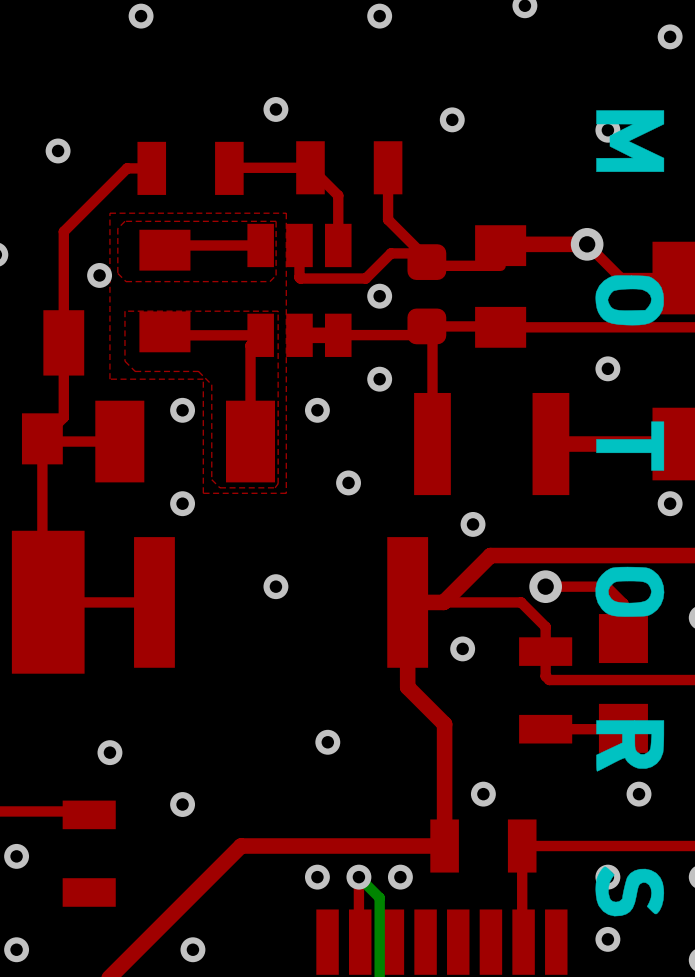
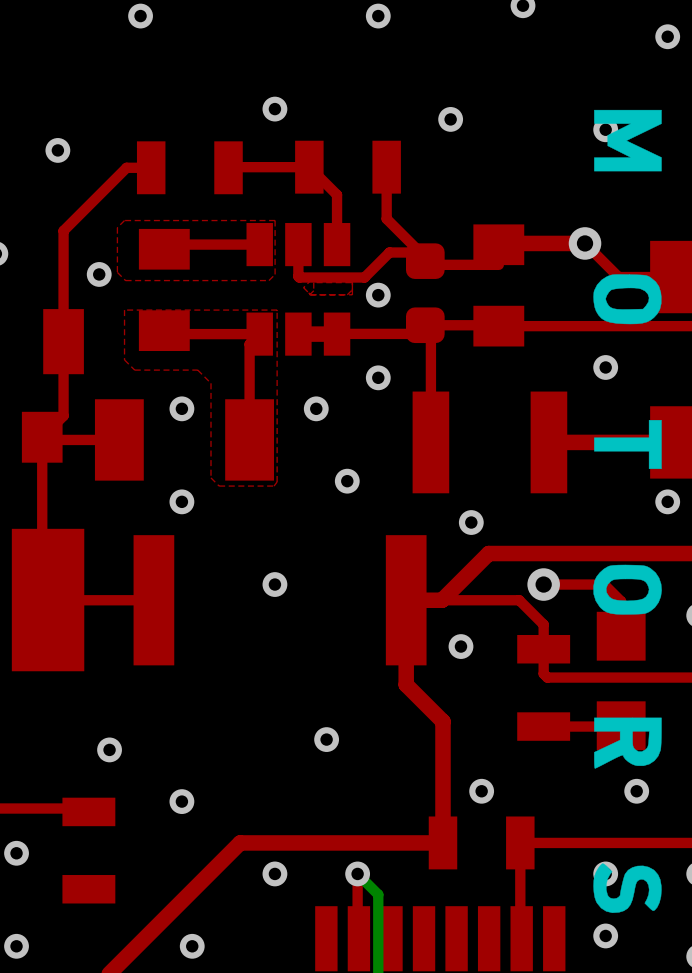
top zone outline: (286, 213) (286, 493) (203, 493) (203, 379) (109, 379) (109, 213) (286, 213) -> none
top zone outline: none -> (352, 282) (313, 282) (313, 290) (309, 294) (352, 294) (352, 279) (311, 279) (303, 287) (310, 294)
top zone outline: none -> (352, 289) (347, 294)
via position: (317, 877) -> (274, 873)
via: (400, 877) -> none

